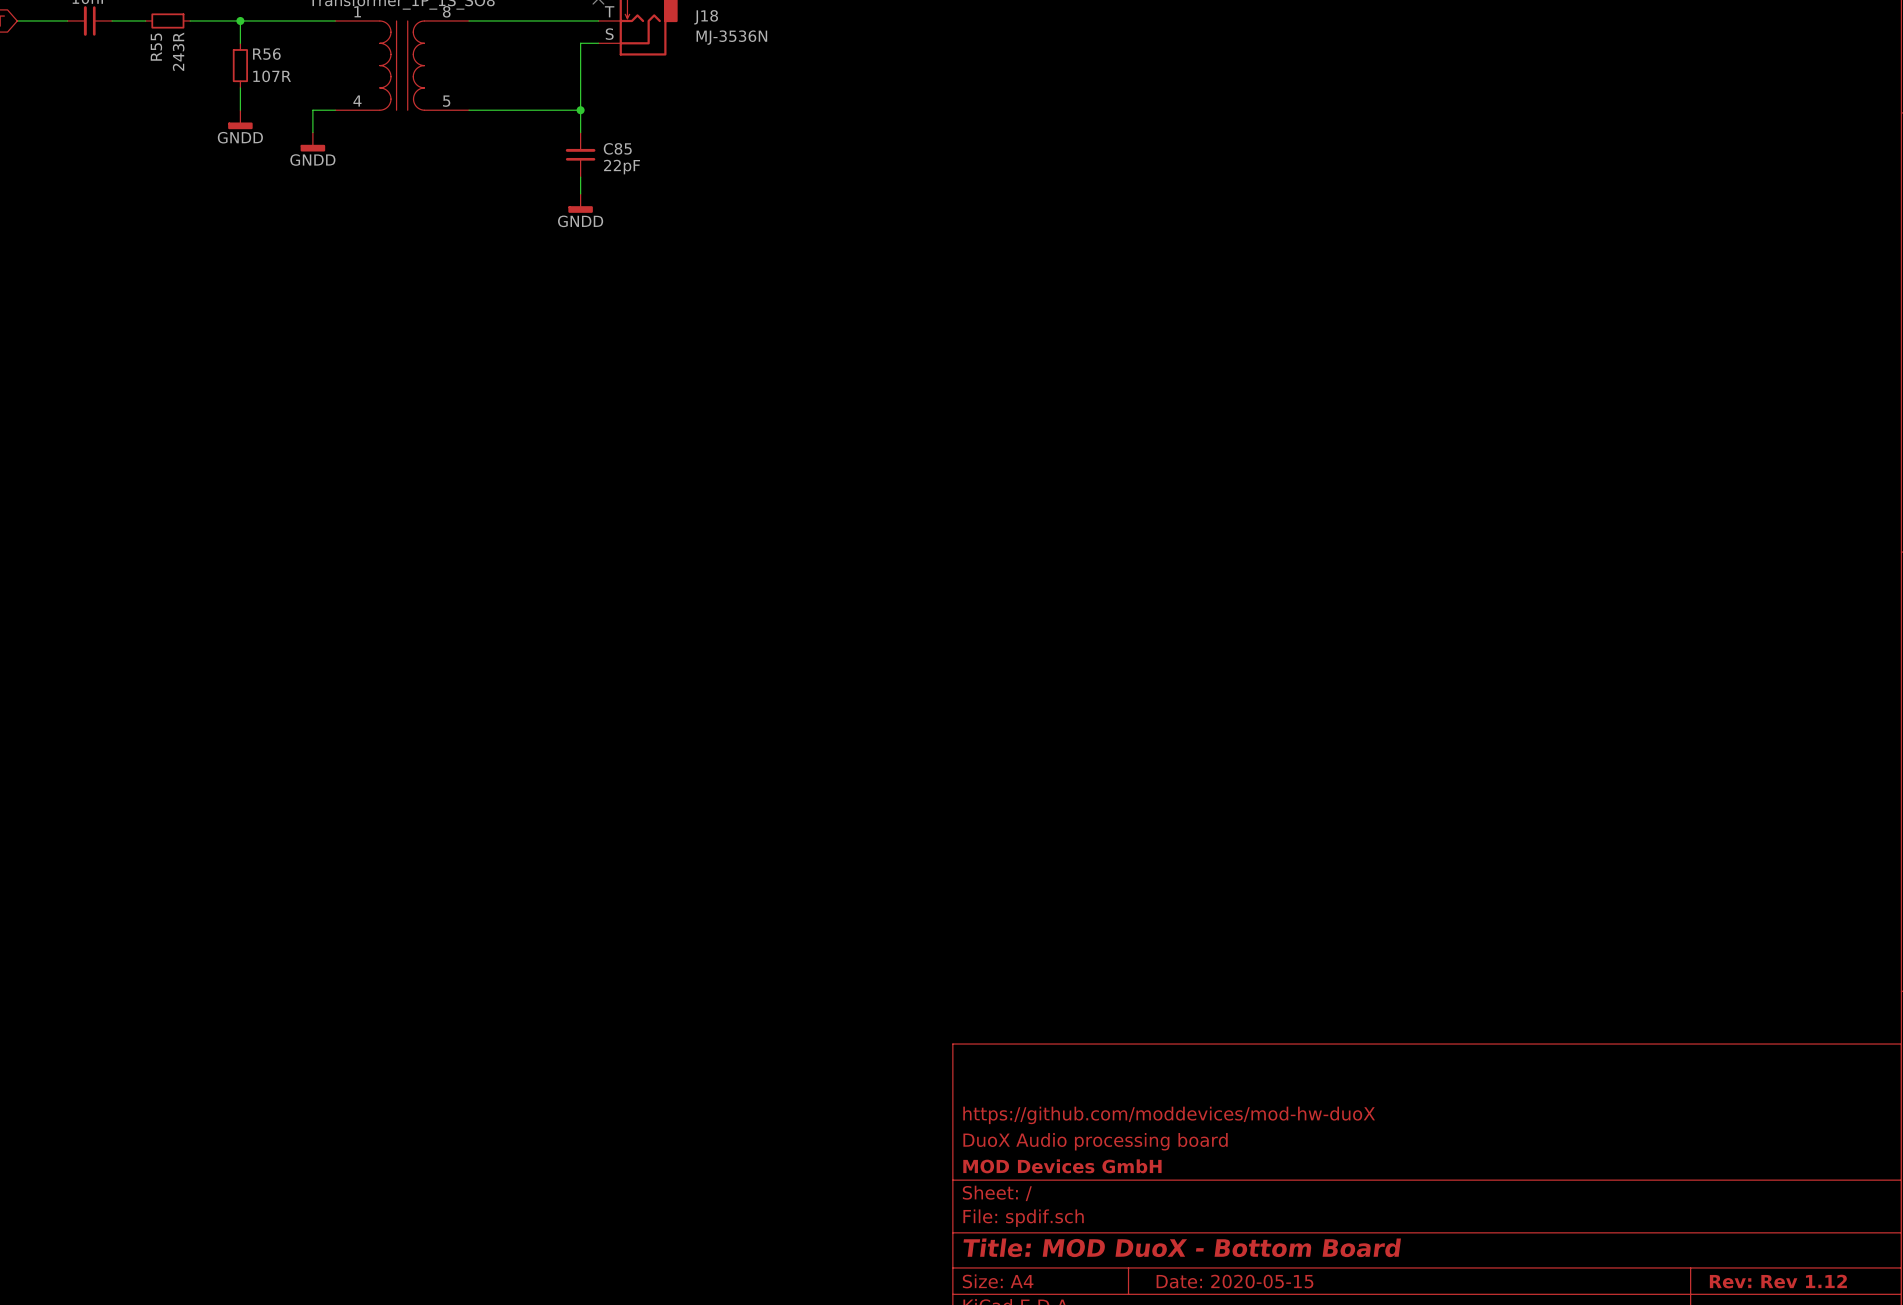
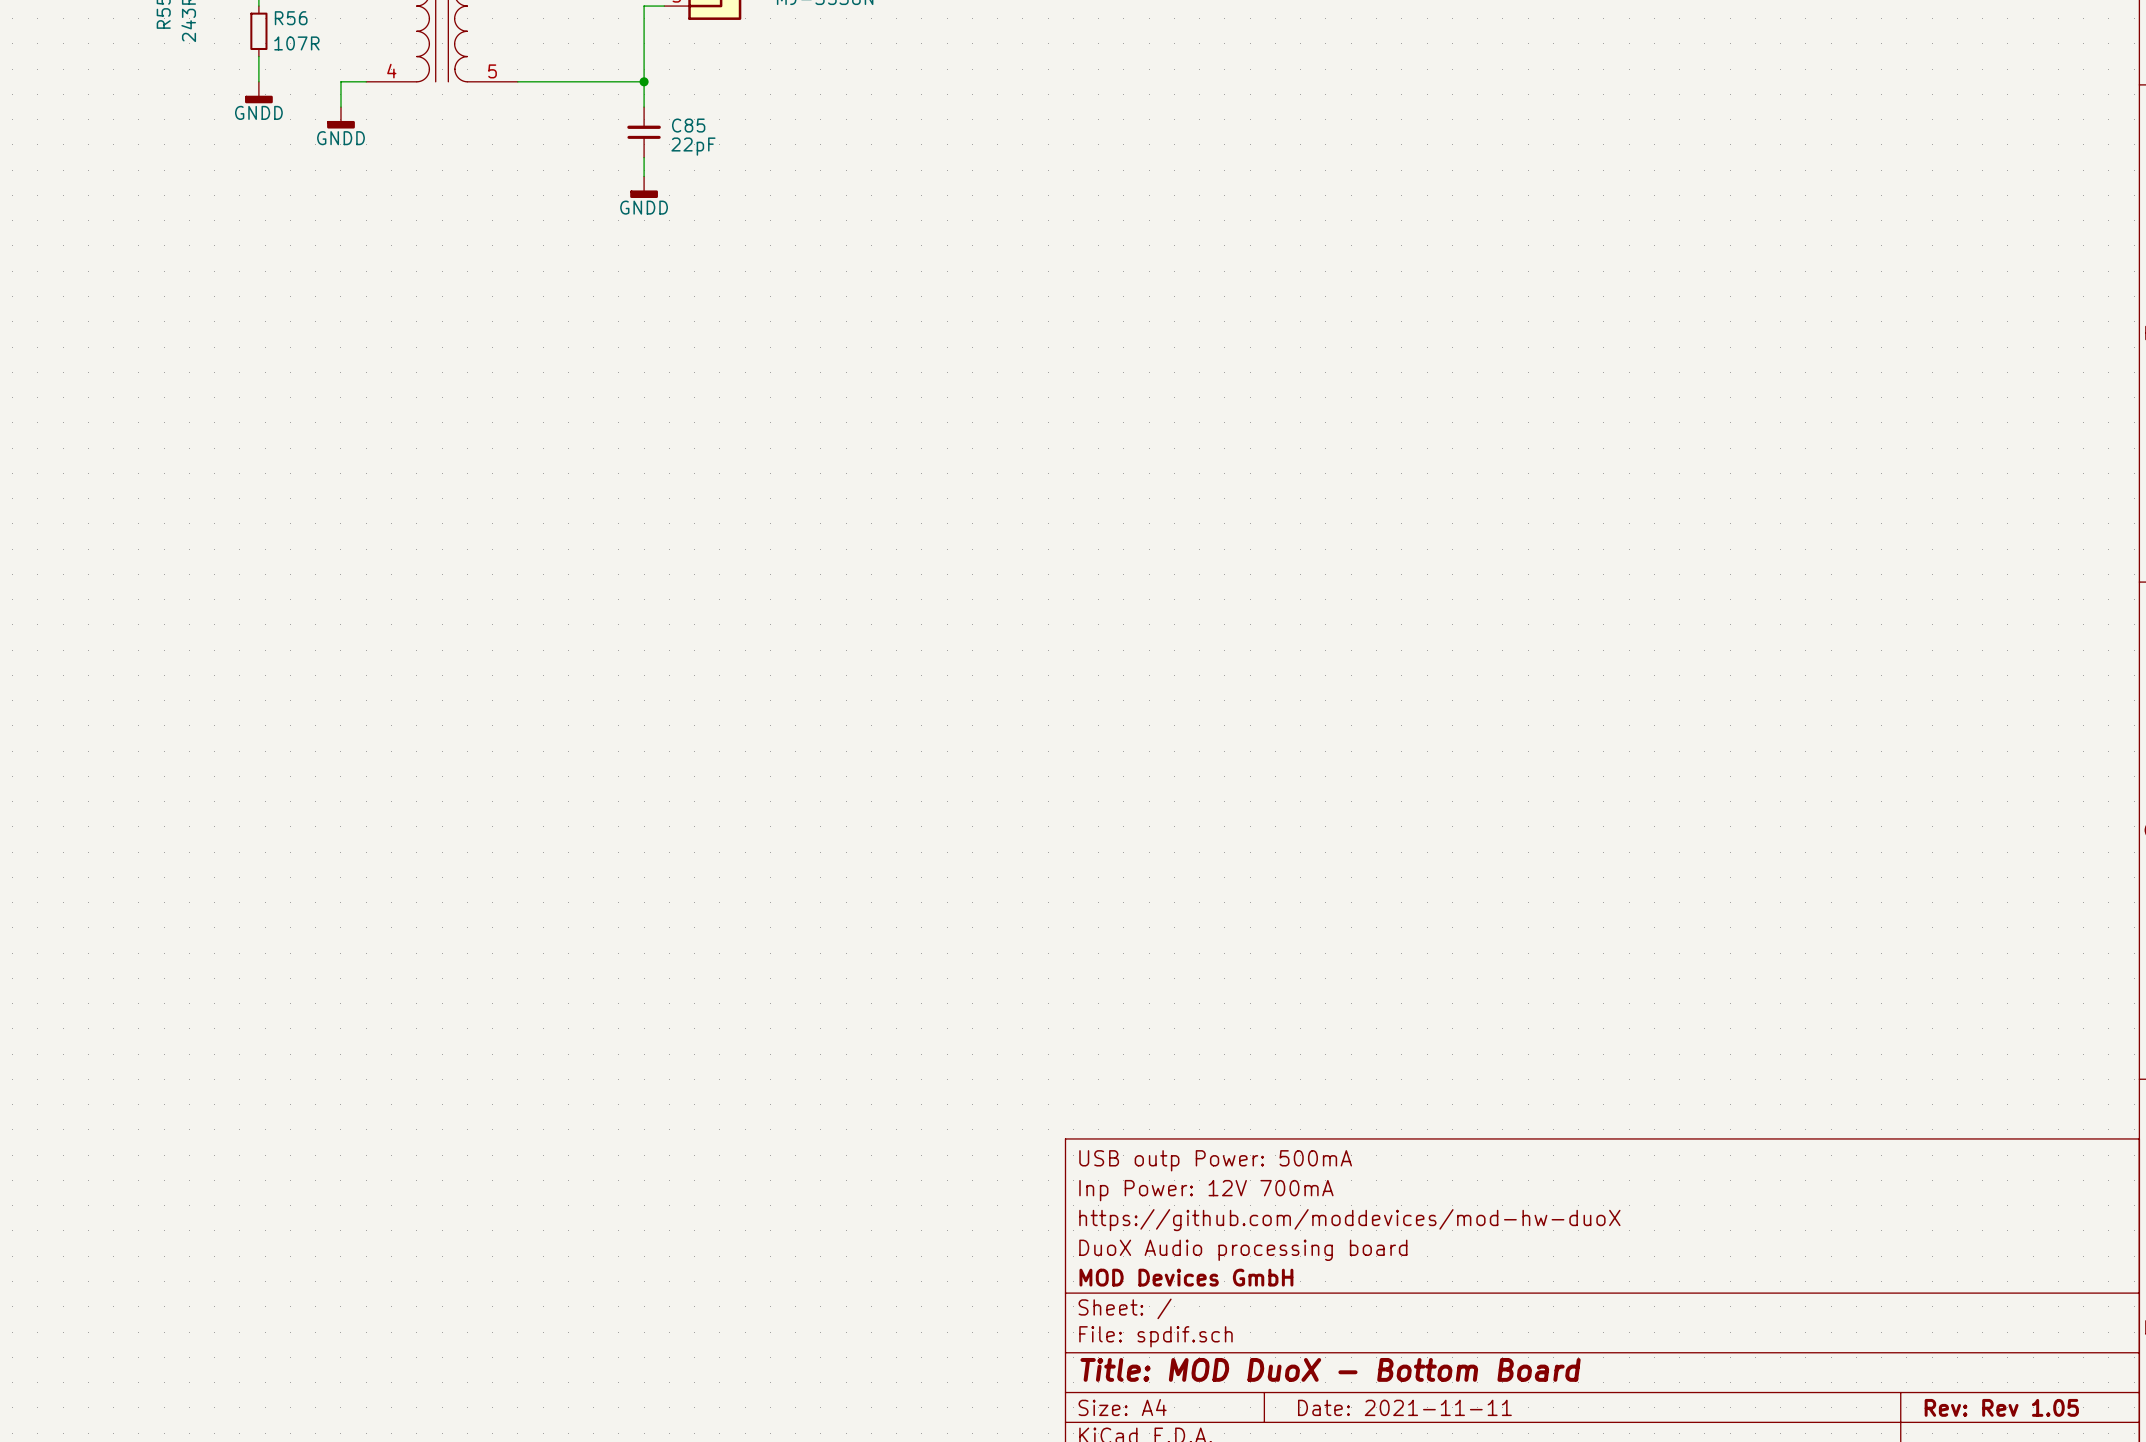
title block: none -> USB outp Power: 500mA (1215, 1160)
title block: none -> Inp Power: 12V 700mA (1206, 1190)
title block: Date: 2020-05-15 (1234, 1281) -> Date: 2021-11-11 (1404, 1407)
title block: Rev: Rev 1.12 (1778, 1281) -> Rev: Rev 1.05 (2001, 1407)

